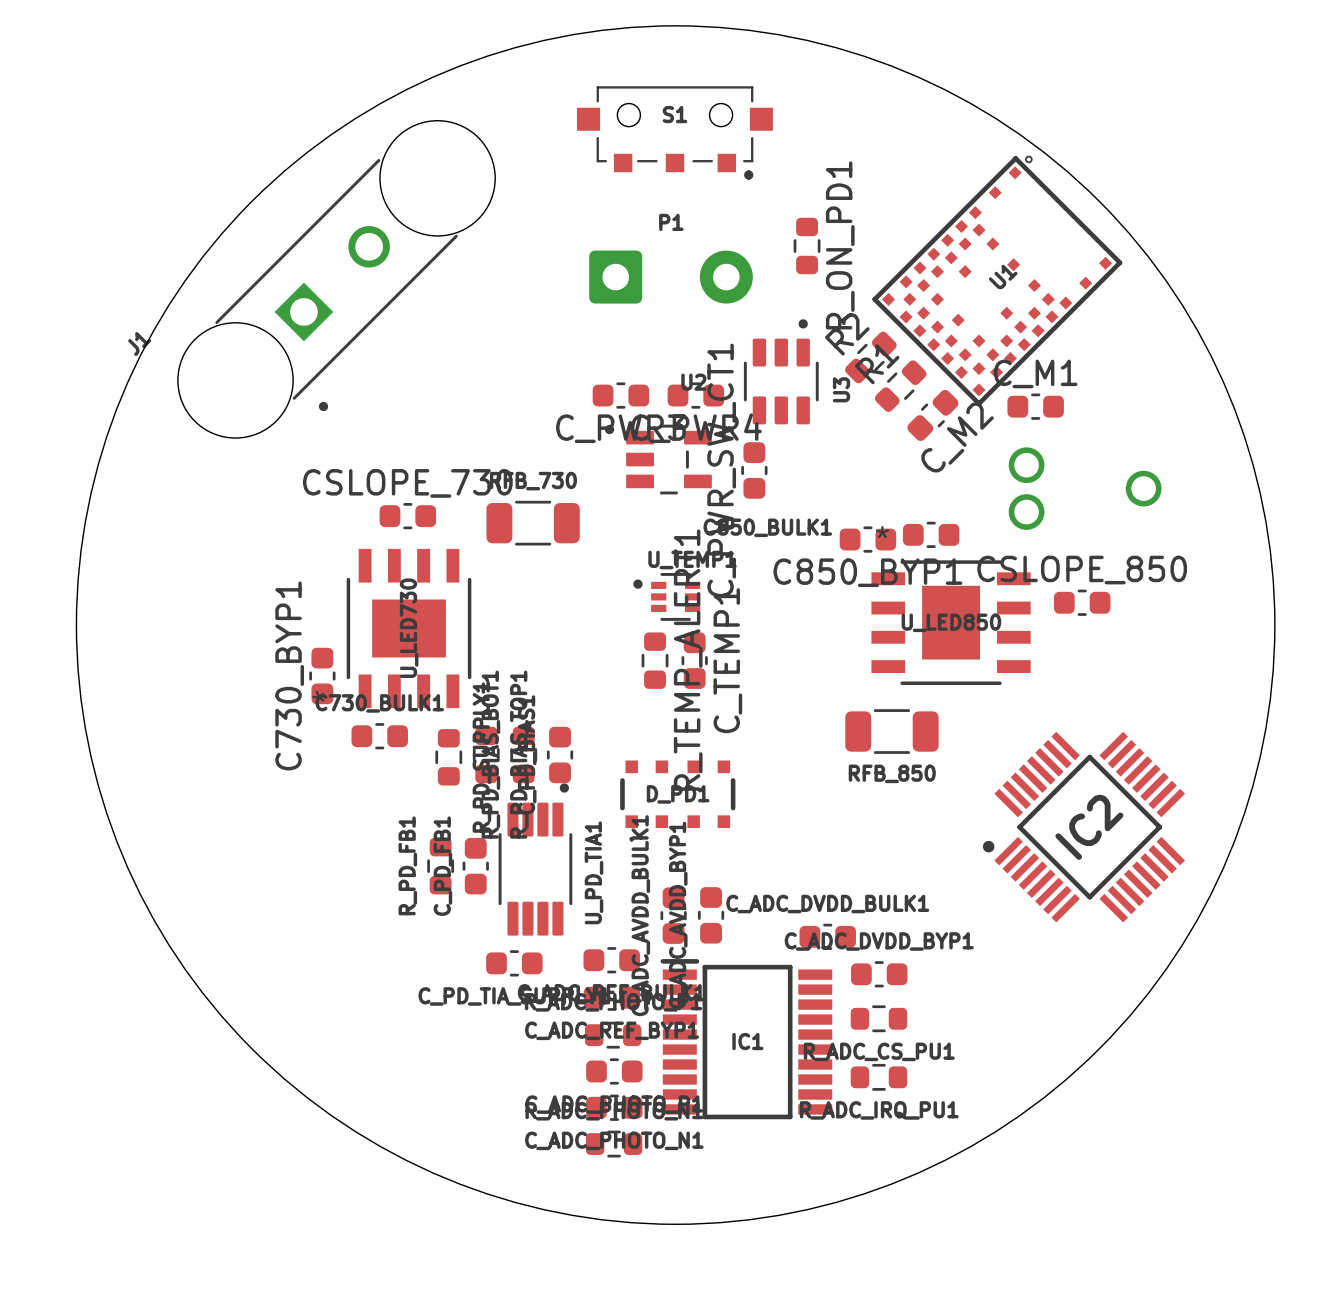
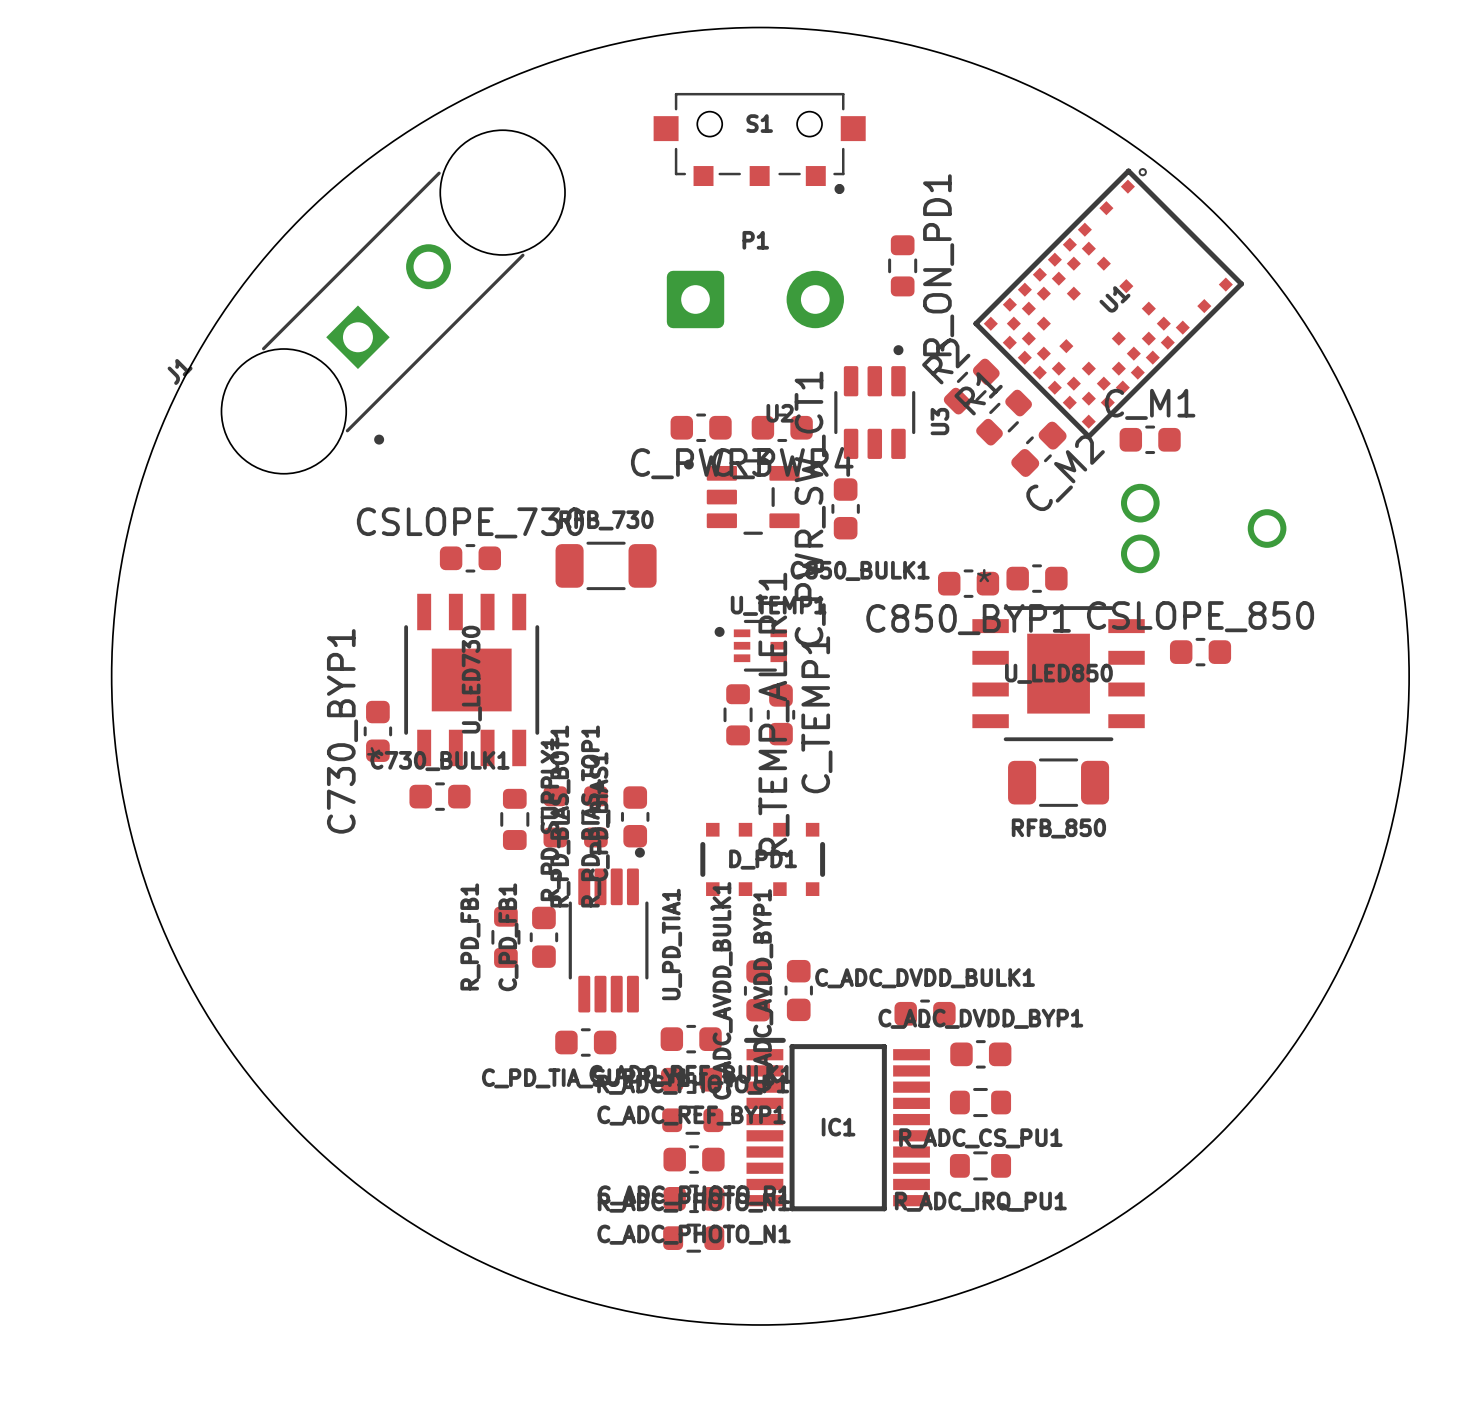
RFB_850 position: (891, 731) -> (1058, 782)
IC2: (1083, 827) -> none

